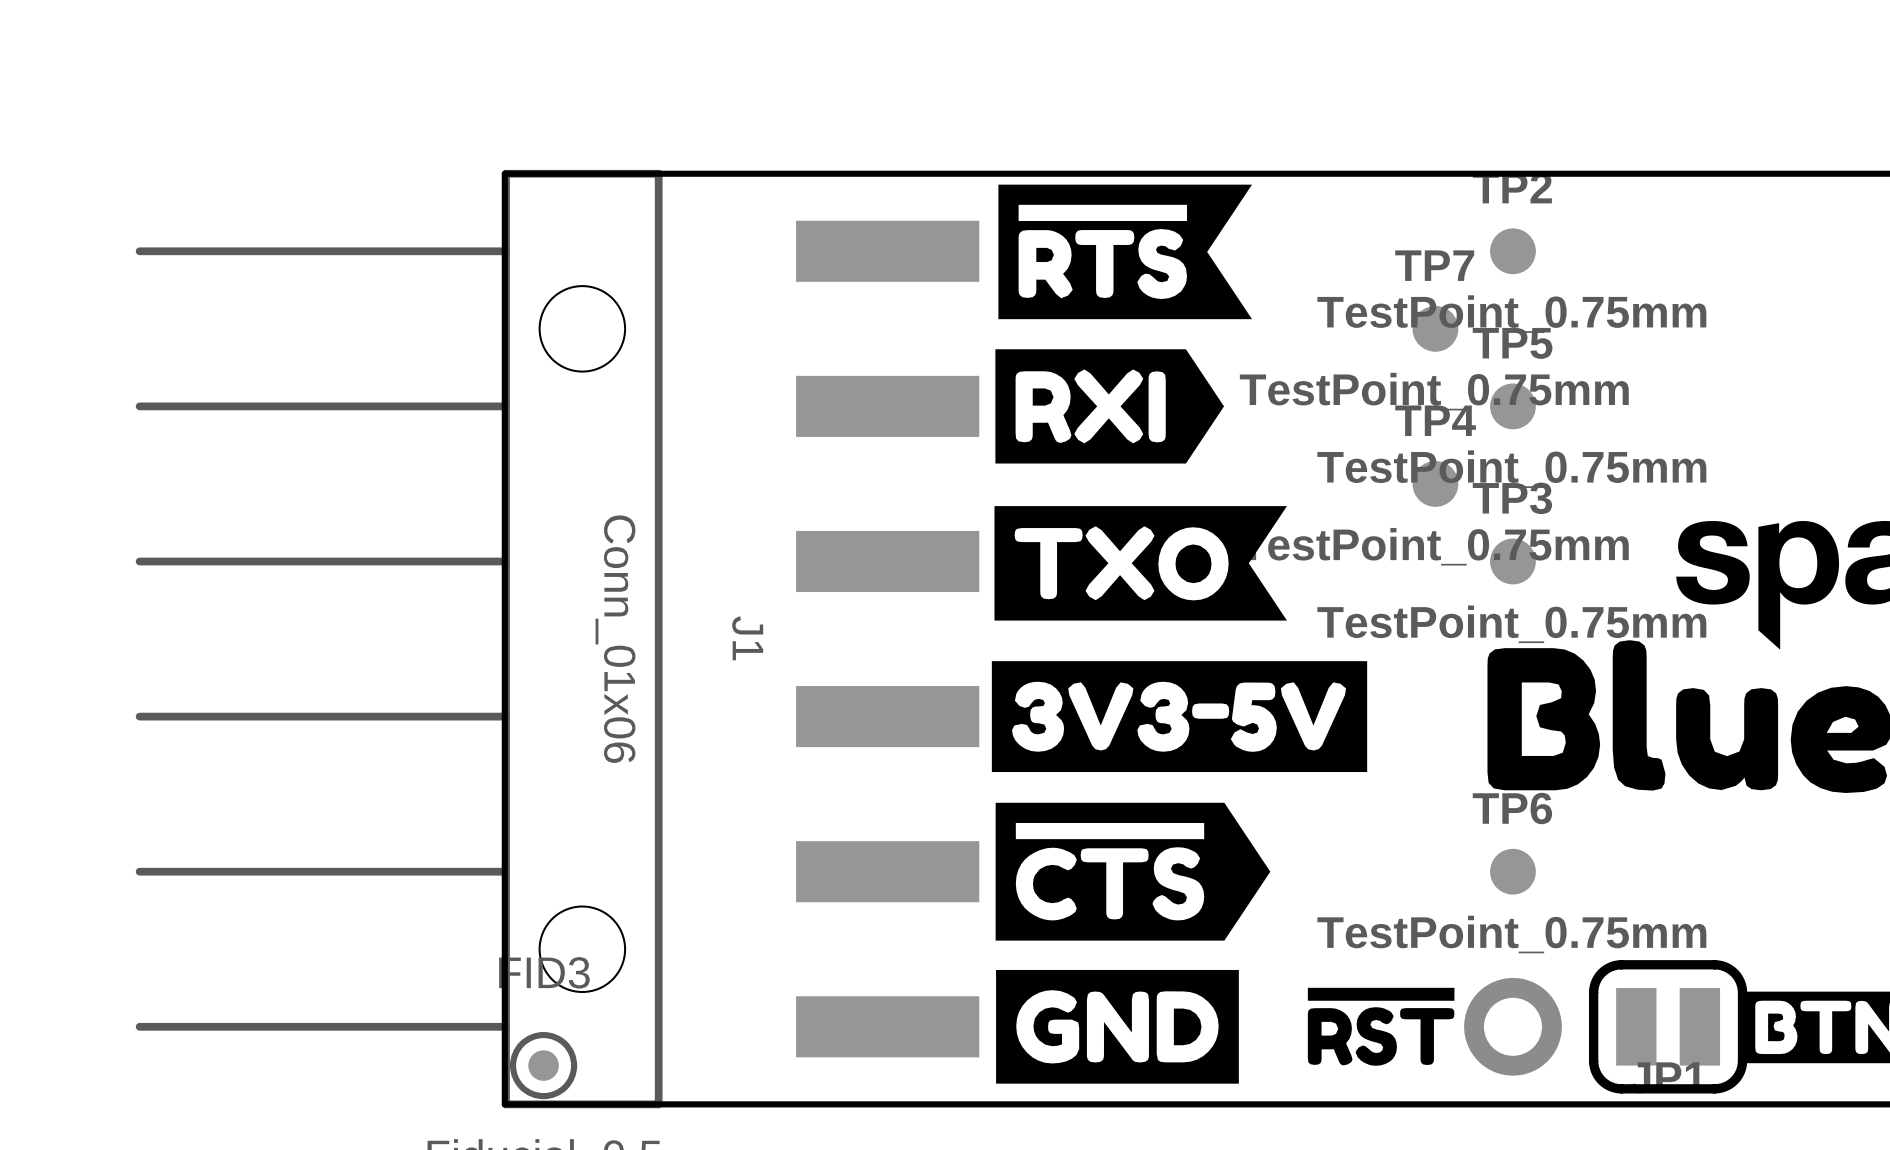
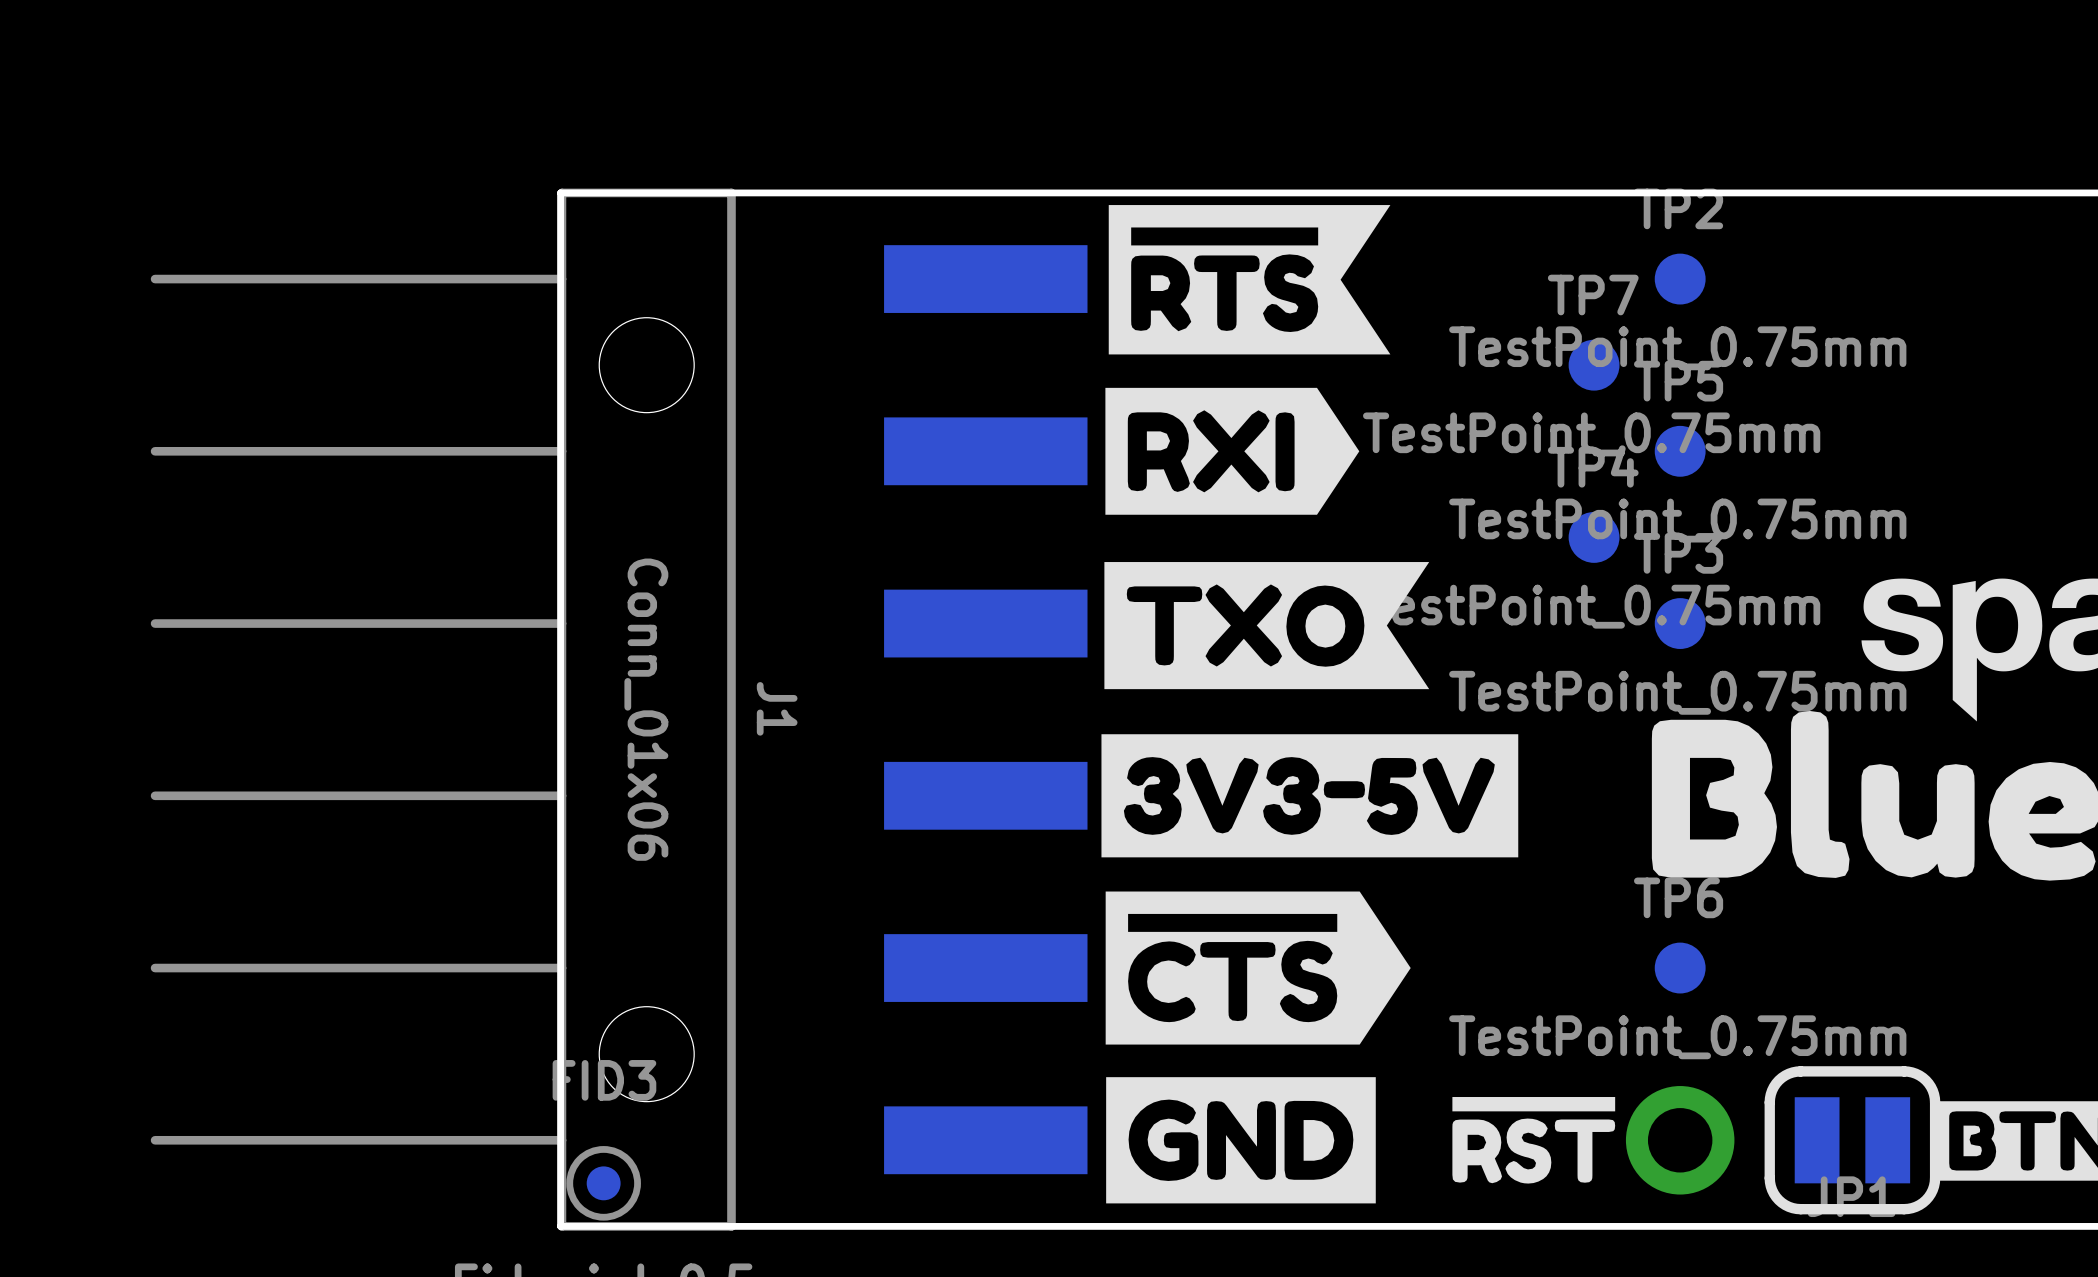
J1 name position: J1 (747, 638) -> J1 (777, 708)
J1 value position: Conn_01x06 (615, 639) -> Conn_01x06 (646, 709)

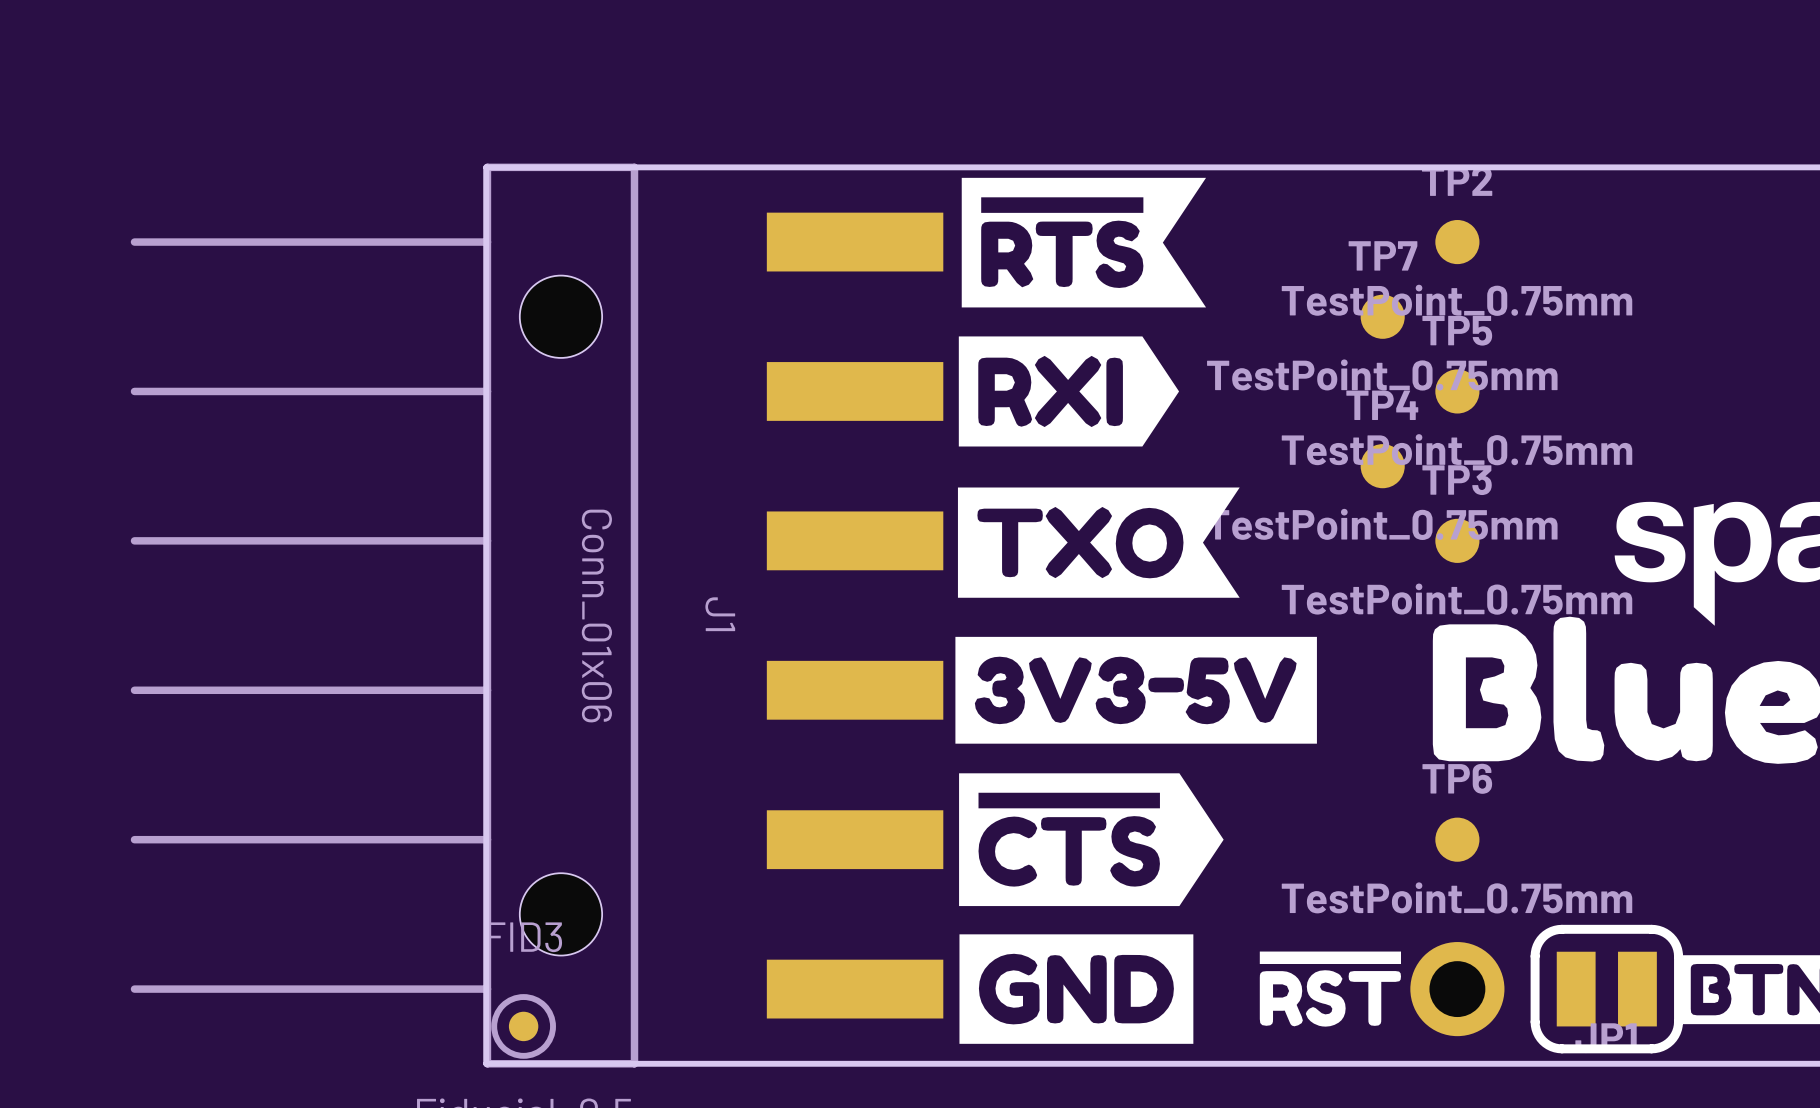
J1 name position: J1 (777, 708) -> J1 (720, 614)
J1 value position: Conn_01x06 (646, 709) -> Conn_01x06 (596, 616)

